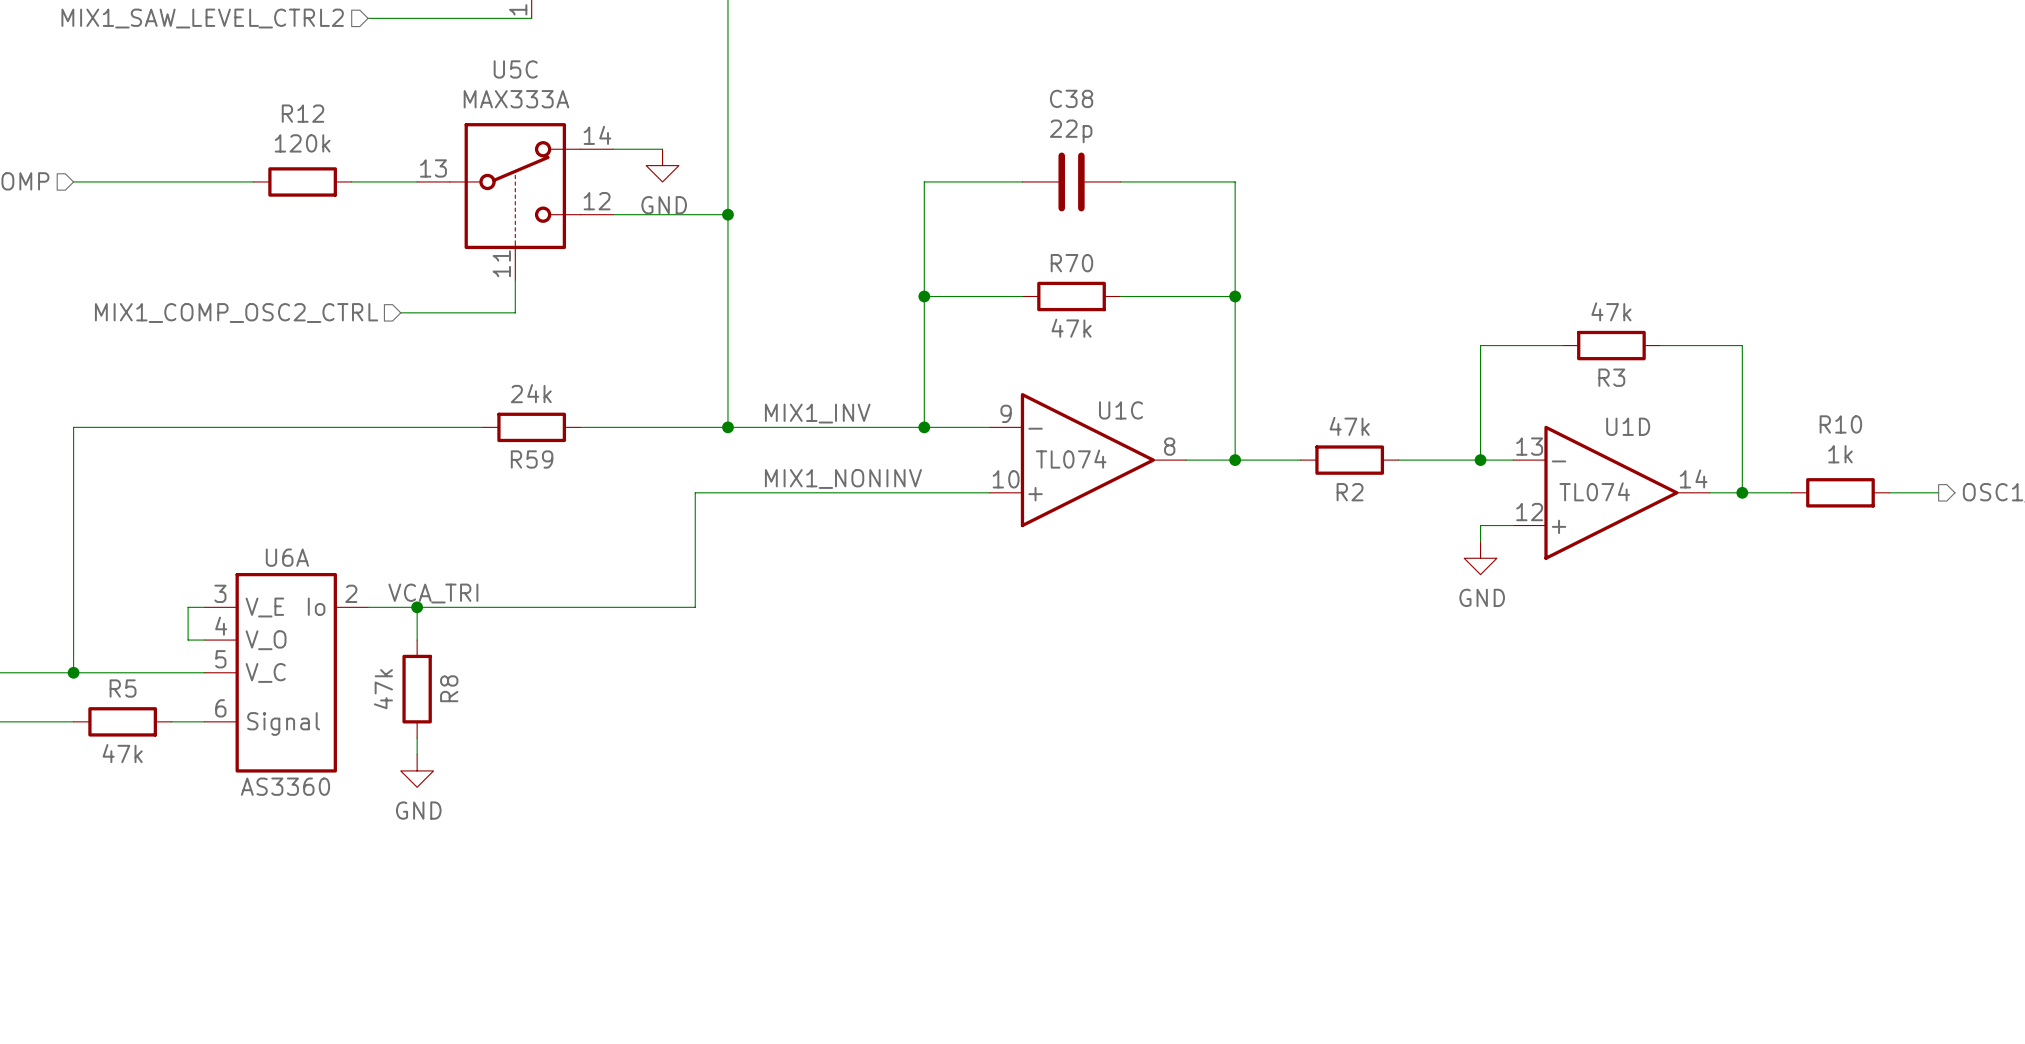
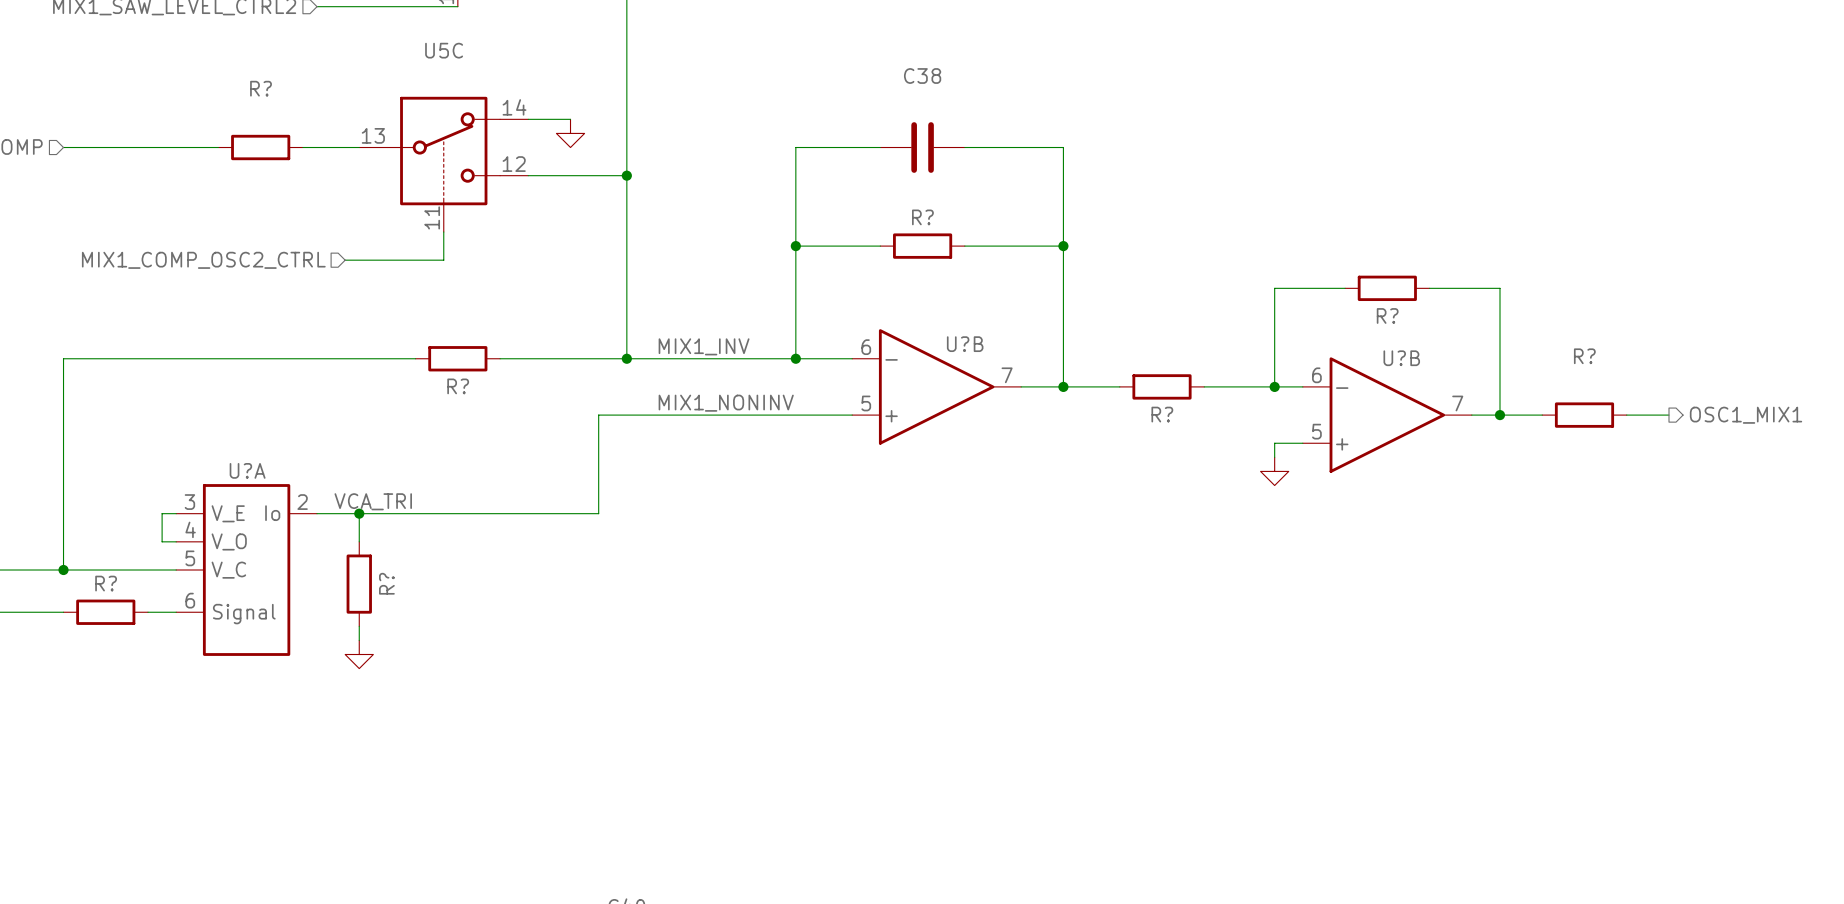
U5C value: MAX333A (516, 99) -> none
R12 name: R12 (303, 113) -> R? (261, 88)
C38 value: 22p (1071, 131) -> none
R12 value: 120k (302, 143) -> none
power symbol text: GND (664, 205) -> none
R70 name: R70 (1071, 263) -> R? (922, 217)
R3 value: 47k (1611, 311) -> none
R70 value: 47k (1071, 328) -> none
R3 name: R3 (1611, 377) -> R? (1387, 315)
R59 value: 24k (531, 393) -> none
U1C name: U1C (1121, 410) -> U?B (965, 344)
U1C pin number: 9 (1006, 413) -> 6 (866, 347)
R10 name: R10 (1840, 424) -> R? (1584, 356)
R2 value: 47k (1349, 426) -> none
U1D name: U1D (1628, 426) -> U?B (1401, 358)
U1C pin number: 8 (1169, 446) -> 7 (1007, 375)
U1D pin number: 13 (1529, 446) -> 6 (1316, 375)
R10 value: 1k (1840, 454) -> none
R59 name: R59 (532, 459) -> R? (458, 386)
U1C value: TL074 (1071, 459) -> none
U1D pin number: 14 (1693, 478) -> 7 (1457, 403)
U1C pin number: 10 (1006, 479) -> 5 (866, 403)
U1D value: TL074 (1594, 491) -> none
R2 name: R2 (1350, 492) -> R? (1162, 414)
U1D pin number: 12 (1529, 512) -> 5 (1316, 431)
U6A name: U6A (287, 557) -> U?A (247, 470)
power symbol text: GND (1482, 597) -> none
R5 name: R5 (123, 688) -> R? (106, 583)
R8 name: R8 (449, 688) -> R? (386, 583)
R8 value: 47k (383, 689) -> none
R5 value: 47k (122, 753) -> none
U6A value: AS3360 (285, 786) -> none
power symbol text: GND (418, 810) -> none

